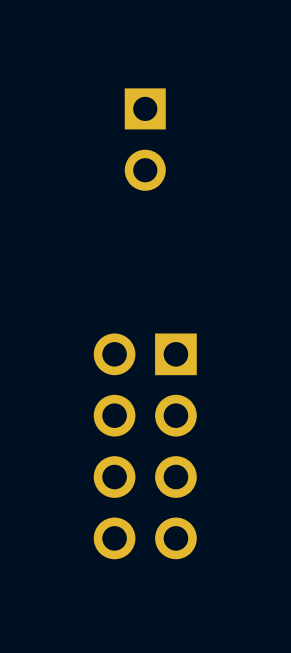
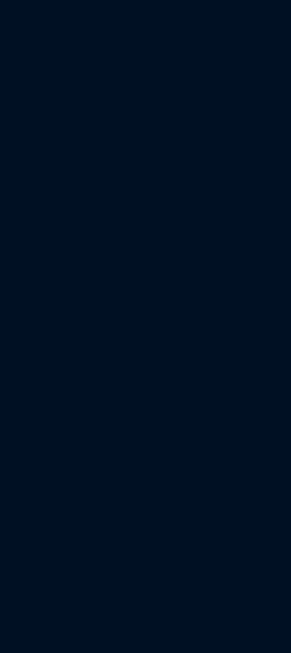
part: (145, 139) -> none
part: (145, 446) -> none

